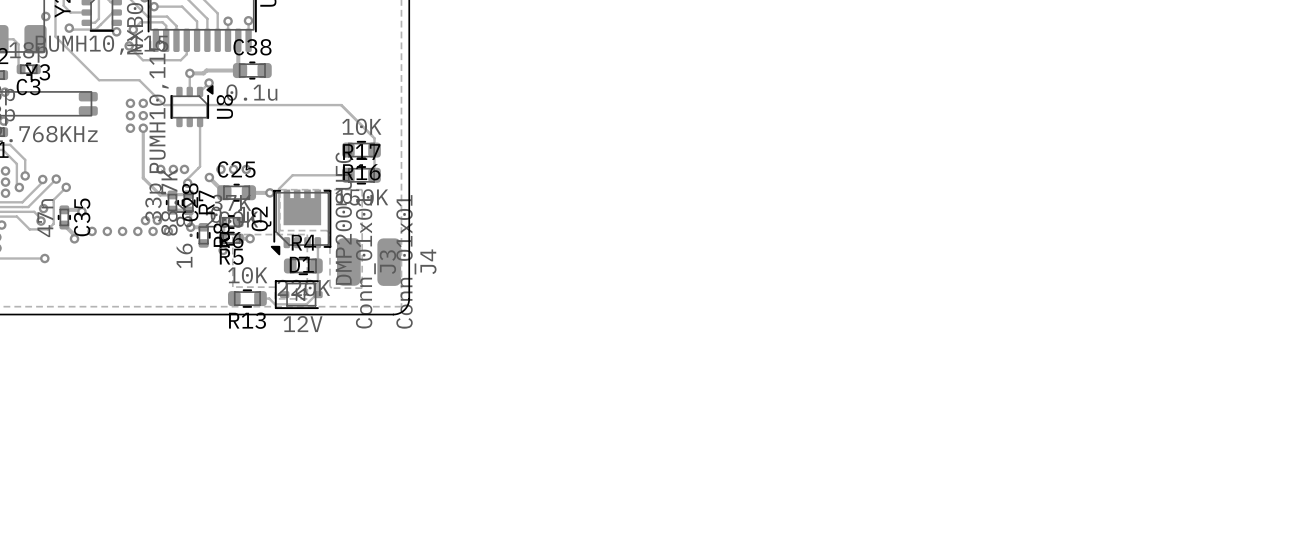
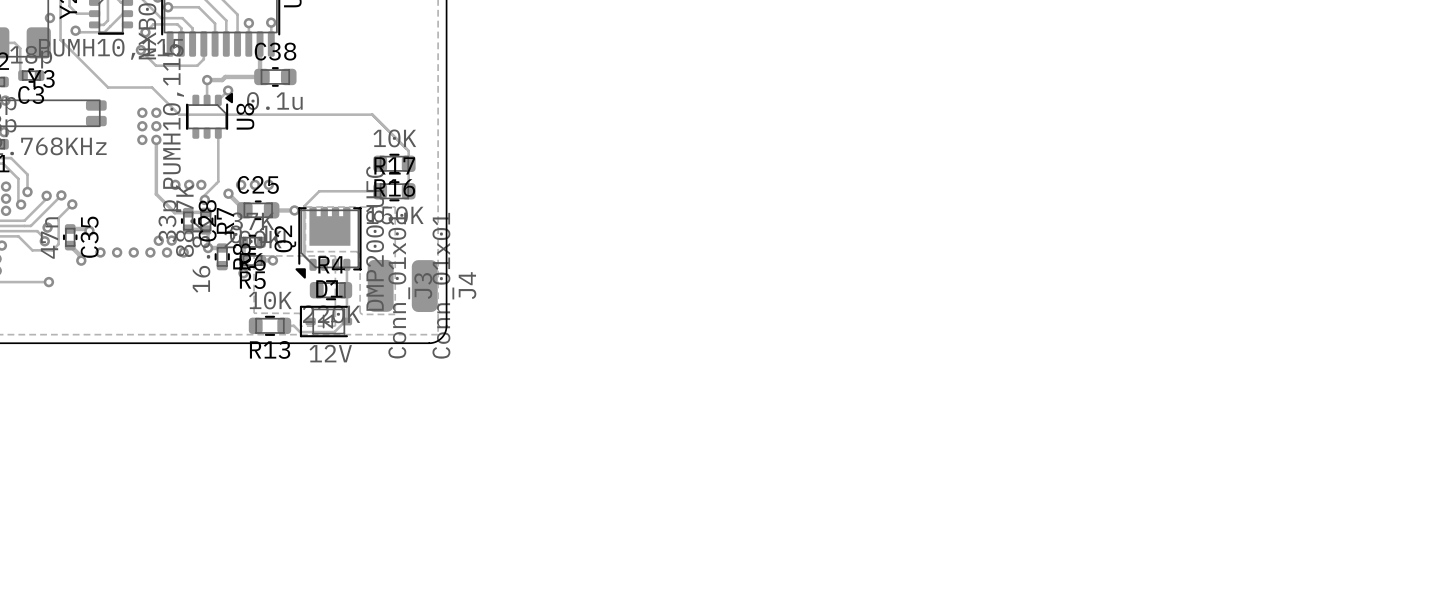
via: (116, 31) -> none

